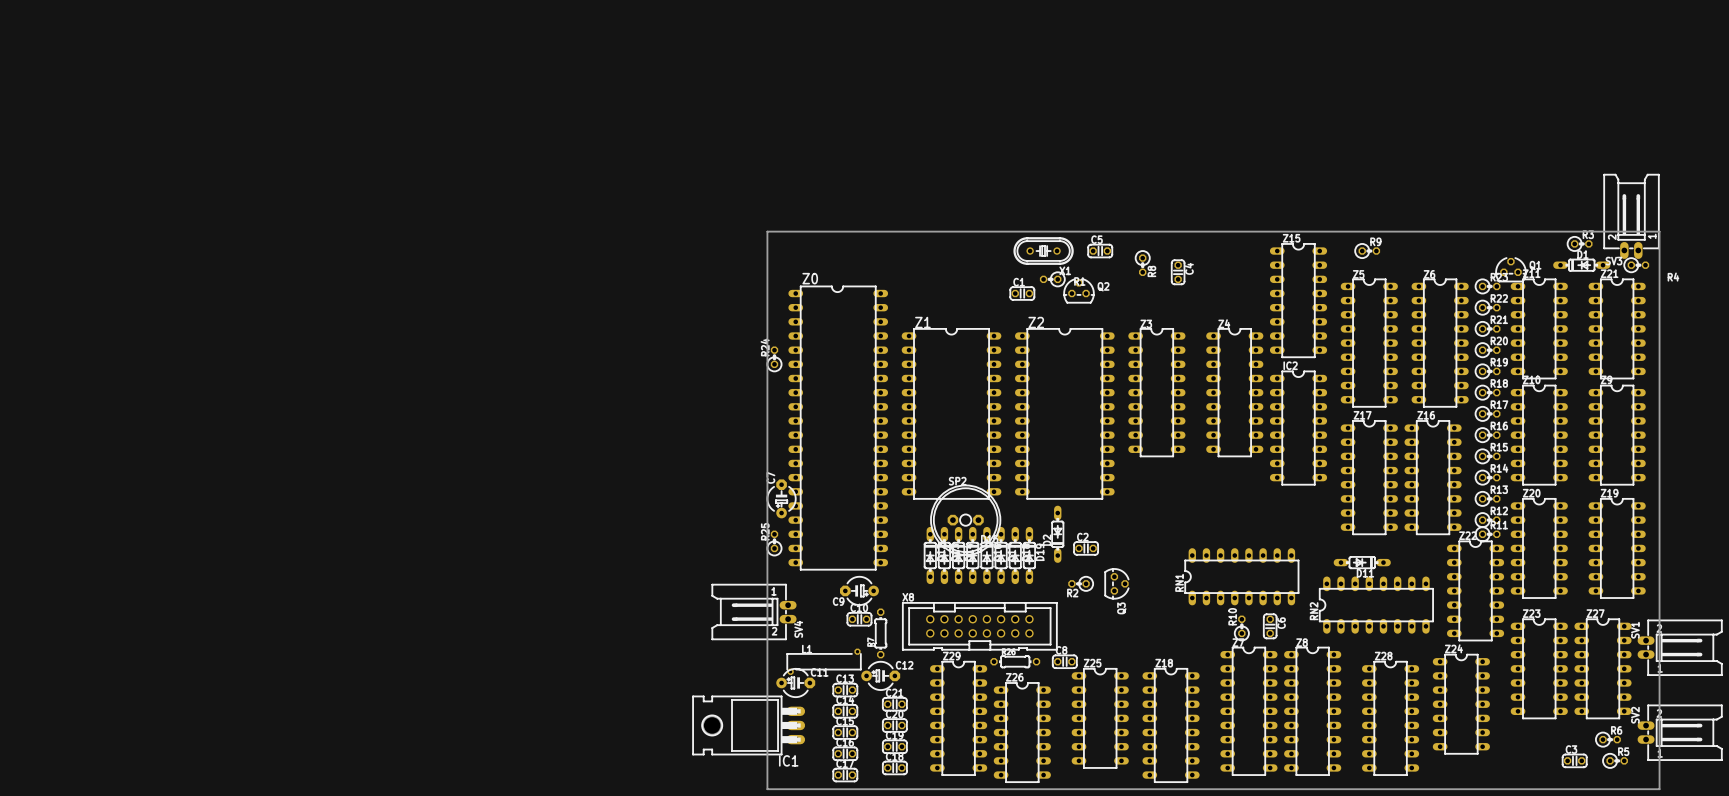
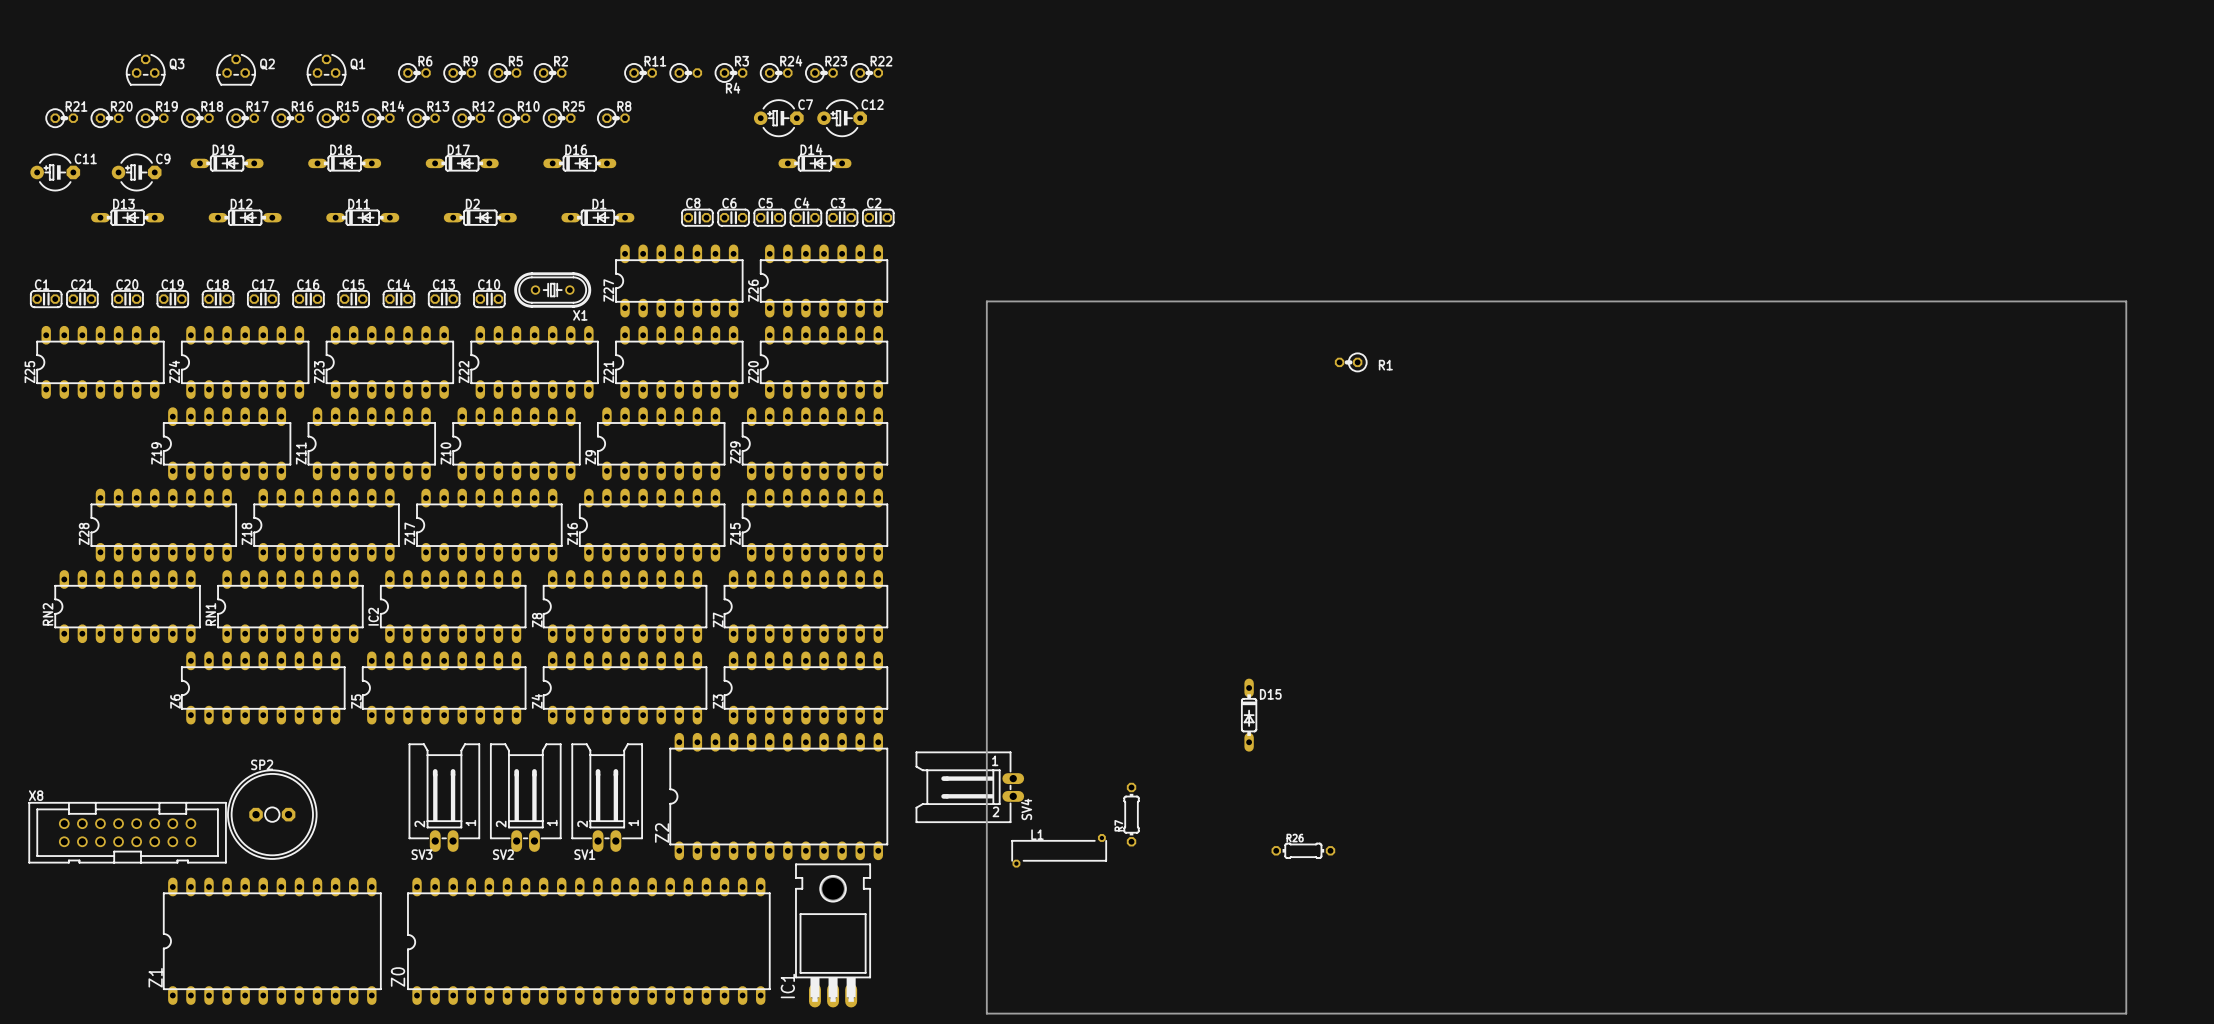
SV3 position: (1631, 216) -> (444, 797)
R3 position: (1579, 243) -> (731, 72)
X1 position: (1043, 251) -> (552, 290)
C5 position: (1100, 251) -> (769, 217)
R9 position: (1367, 251) -> (459, 72)
R8 rotation: 0° (1142, 263) -> 90° counterclockwise (613, 118)
R8 position: (1142, 263) -> (613, 118)
D1 position: (1581, 265) -> (597, 217)
R4 position: (1636, 265) -> (685, 72)
Q1 position: (1510, 269) -> (326, 69)
C4 rotation: 0° (1178, 272) -> 90° counterclockwise (805, 217)
C4 position: (1178, 272) -> (805, 217)
R23 position: (1487, 286) -> (821, 72)
Q2 position: (1078, 291) -> (236, 69)
C1 position: (1022, 293) -> (46, 299)
Z15 rotation: 0° (1298, 300) -> 90° counterclockwise (814, 525)
Z15 position: (1298, 300) -> (814, 525)
R22 position: (1487, 307) -> (866, 72)
R21 position: (1487, 328) -> (61, 118)
Z11 rotation: 0° (1539, 328) -> 90° counterclockwise (371, 443)
Z11 position: (1539, 328) -> (371, 443)
Z21 rotation: 0° (1617, 328) -> 90° counterclockwise (679, 362)
Z21 position: (1617, 328) -> (679, 362)
Z5 rotation: 0° (1369, 343) -> 90° counterclockwise (444, 688)
Z5 position: (1369, 343) -> (444, 688)
Z6 rotation: 0° (1440, 343) -> 90° counterclockwise (263, 688)
Z6 position: (1440, 343) -> (263, 688)
R20 position: (1487, 350) -> (107, 118)
R24 rotation: 0° (774, 359) -> 90° clockwise (776, 72)
R24 position: (774, 359) -> (776, 72)
R19 position: (1487, 371) -> (152, 118)
Z3 rotation: 0° (1156, 392) -> 90° counterclockwise (805, 688)
Z3 position: (1156, 392) -> (805, 688)
Z4 rotation: 0° (1234, 392) -> 90° counterclockwise (625, 688)
Z4 position: (1234, 392) -> (625, 688)
R18 position: (1487, 392) -> (197, 118)
Z1 rotation: 0° (951, 413) -> 90° counterclockwise (272, 941)
Z1 position: (951, 413) -> (272, 941)
Z2 rotation: 0° (1064, 413) -> 90° counterclockwise (778, 796)
Z2 position: (1064, 413) -> (778, 796)
R17 position: (1487, 413) -> (242, 118)
Z0 rotation: 0° (838, 428) -> 90° counterclockwise (588, 941)
Z0 position: (838, 428) -> (588, 941)
IC2 rotation: 0° (1298, 428) -> 90° counterclockwise (453, 606)
IC2 position: (1298, 428) -> (453, 606)
R16 position: (1487, 435) -> (287, 118)
Z10 rotation: 0° (1539, 435) -> 90° counterclockwise (516, 443)
Z10 position: (1539, 435) -> (516, 443)
Z9 rotation: 0° (1617, 435) -> 90° counterclockwise (661, 443)
Z9 position: (1617, 435) -> (661, 443)
R15 position: (1487, 456) -> (333, 118)
Z17 rotation: 0° (1369, 477) -> 90° counterclockwise (489, 525)
Z17 position: (1369, 477) -> (489, 525)
Z16 rotation: 0° (1433, 477) -> 90° counterclockwise (652, 525)
Z16 position: (1433, 477) -> (652, 525)
R14 position: (1487, 477) -> (378, 118)
C7 rotation: 0° (781, 498) -> 90° clockwise (778, 118)
C7 position: (781, 498) -> (778, 118)
R13 position: (1487, 498) -> (423, 118)
SP2 position: (965, 520) -> (272, 814)
R12 position: (1487, 520) -> (468, 118)
D2 rotation: 0° (1057, 534) -> 90° clockwise (480, 217)
D2 position: (1057, 534) -> (480, 217)
R11 position: (1487, 534) -> (640, 72)
R25 rotation: 0° (774, 543) -> 90° clockwise (559, 118)
R25 position: (774, 543) -> (559, 118)
C2 position: (1086, 548) -> (878, 217)
Z20 rotation: 0° (1539, 548) -> 90° counterclockwise (824, 362)
Z20 position: (1539, 548) -> (824, 362)
Z19 rotation: 0° (1617, 548) -> 90° counterclockwise (227, 443)
Z19 position: (1617, 548) -> (227, 443)
D12 rotation: 0° (930, 555) -> 90° counterclockwise (245, 217)
D12 position: (930, 555) -> (245, 217)
D13 rotation: 0° (944, 555) -> 90° counterclockwise (127, 217)
D13 position: (944, 555) -> (127, 217)
D14 rotation: 0° (958, 555) -> 90° counterclockwise (814, 163)
D14 position: (958, 555) -> (814, 163)
D16 rotation: 0° (986, 555) -> 90° counterclockwise (579, 163)
D16 position: (986, 555) -> (579, 163)
D17 rotation: 0° (1001, 555) -> 90° counterclockwise (462, 163)
D17 position: (1001, 555) -> (462, 163)
D18 rotation: 0° (1015, 555) -> 90° counterclockwise (344, 163)
D18 position: (1015, 555) -> (344, 163)
D19 rotation: 0° (1029, 555) -> 90° counterclockwise (227, 163)
D19 position: (1029, 555) -> (227, 163)
D11 rotation: 0° (1362, 562) -> 180° (362, 217)
D11 position: (1362, 562) -> (362, 217)
RN1 position: (1241, 576) -> (290, 606)
R2 rotation: 0° (1080, 583) -> 180° (550, 72)
R2 position: (1080, 583) -> (550, 72)
Q3 rotation: 0° (1116, 583) -> 90° counterclockwise (145, 69)
Q3 position: (1116, 583) -> (145, 69)
C9 rotation: 0° (859, 590) -> 180° (136, 172)
C9 position: (859, 590) -> (136, 172)
Z22 rotation: 0° (1475, 590) -> 90° counterclockwise (534, 362)
Z22 position: (1475, 590) -> (534, 362)
RN2 position: (1376, 605) -> (127, 606)
C10 position: (859, 619) -> (489, 299)
X8 position: (979, 626) -> (127, 832)
C6 rotation: 0° (1270, 626) -> 90° counterclockwise (733, 217)
C6 position: (1270, 626) -> (733, 217)
R10 rotation: 0° (1241, 628) -> 90° clockwise (514, 118)
R10 position: (1241, 628) -> (514, 118)
SV1 rotation: 0° (1679, 647) -> 90° counterclockwise (607, 797)
SV1 position: (1679, 647) -> (607, 797)
C8 position: (1064, 661) -> (697, 217)
Z23 rotation: 0° (1539, 668) -> 90° counterclockwise (389, 362)
Z23 position: (1539, 668) -> (389, 362)
Z27 rotation: 0° (1603, 668) -> 90° counterclockwise (679, 281)
Z27 position: (1603, 668) -> (679, 281)
C12 position: (880, 675) -> (842, 118)
C11 position: (795, 682) -> (55, 172)
C13 position: (845, 690) -> (444, 299)
C21 position: (894, 704) -> (82, 299)
Z24 rotation: 0° (1461, 704) -> 90° counterclockwise (245, 362)
Z24 position: (1461, 704) -> (245, 362)
C14 position: (845, 711) -> (398, 299)
Z7 rotation: 0° (1248, 711) -> 90° counterclockwise (805, 606)
Z7 position: (1248, 711) -> (805, 606)
Z8 rotation: 0° (1312, 711) -> 90° counterclockwise (625, 606)
Z8 position: (1312, 711) -> (625, 606)
Z29 rotation: 0° (958, 718) -> 90° counterclockwise (814, 443)
Z29 position: (958, 718) -> (814, 443)
Z25 rotation: 0° (1100, 718) -> 90° counterclockwise (100, 362)
Z25 position: (1100, 718) -> (100, 362)
Z28 rotation: 0° (1390, 718) -> 90° counterclockwise (163, 525)
Z28 position: (1390, 718) -> (163, 525)
IC1 rotation: 0° (748, 725) -> 90° clockwise (833, 935)
IC1 position: (748, 725) -> (833, 935)
C20 position: (894, 725) -> (127, 299)
Z18 rotation: 0° (1171, 725) -> 90° counterclockwise (326, 525)
Z18 position: (1171, 725) -> (326, 525)
C15 position: (845, 732) -> (353, 299)
Z26 rotation: 0° (1022, 732) -> 90° counterclockwise (824, 281)
Z26 position: (1022, 732) -> (824, 281)
SV2 rotation: 0° (1679, 732) -> 90° counterclockwise (525, 797)
SV2 position: (1679, 732) -> (525, 797)
R6 position: (1608, 739) -> (414, 72)
C19 position: (894, 746) -> (172, 299)
C16 position: (845, 753) -> (308, 299)
C3 position: (1574, 760) -> (842, 217)
R5 position: (1615, 760) -> (505, 72)
C18 position: (894, 767) -> (218, 299)
C17 position: (845, 775) -> (263, 299)

